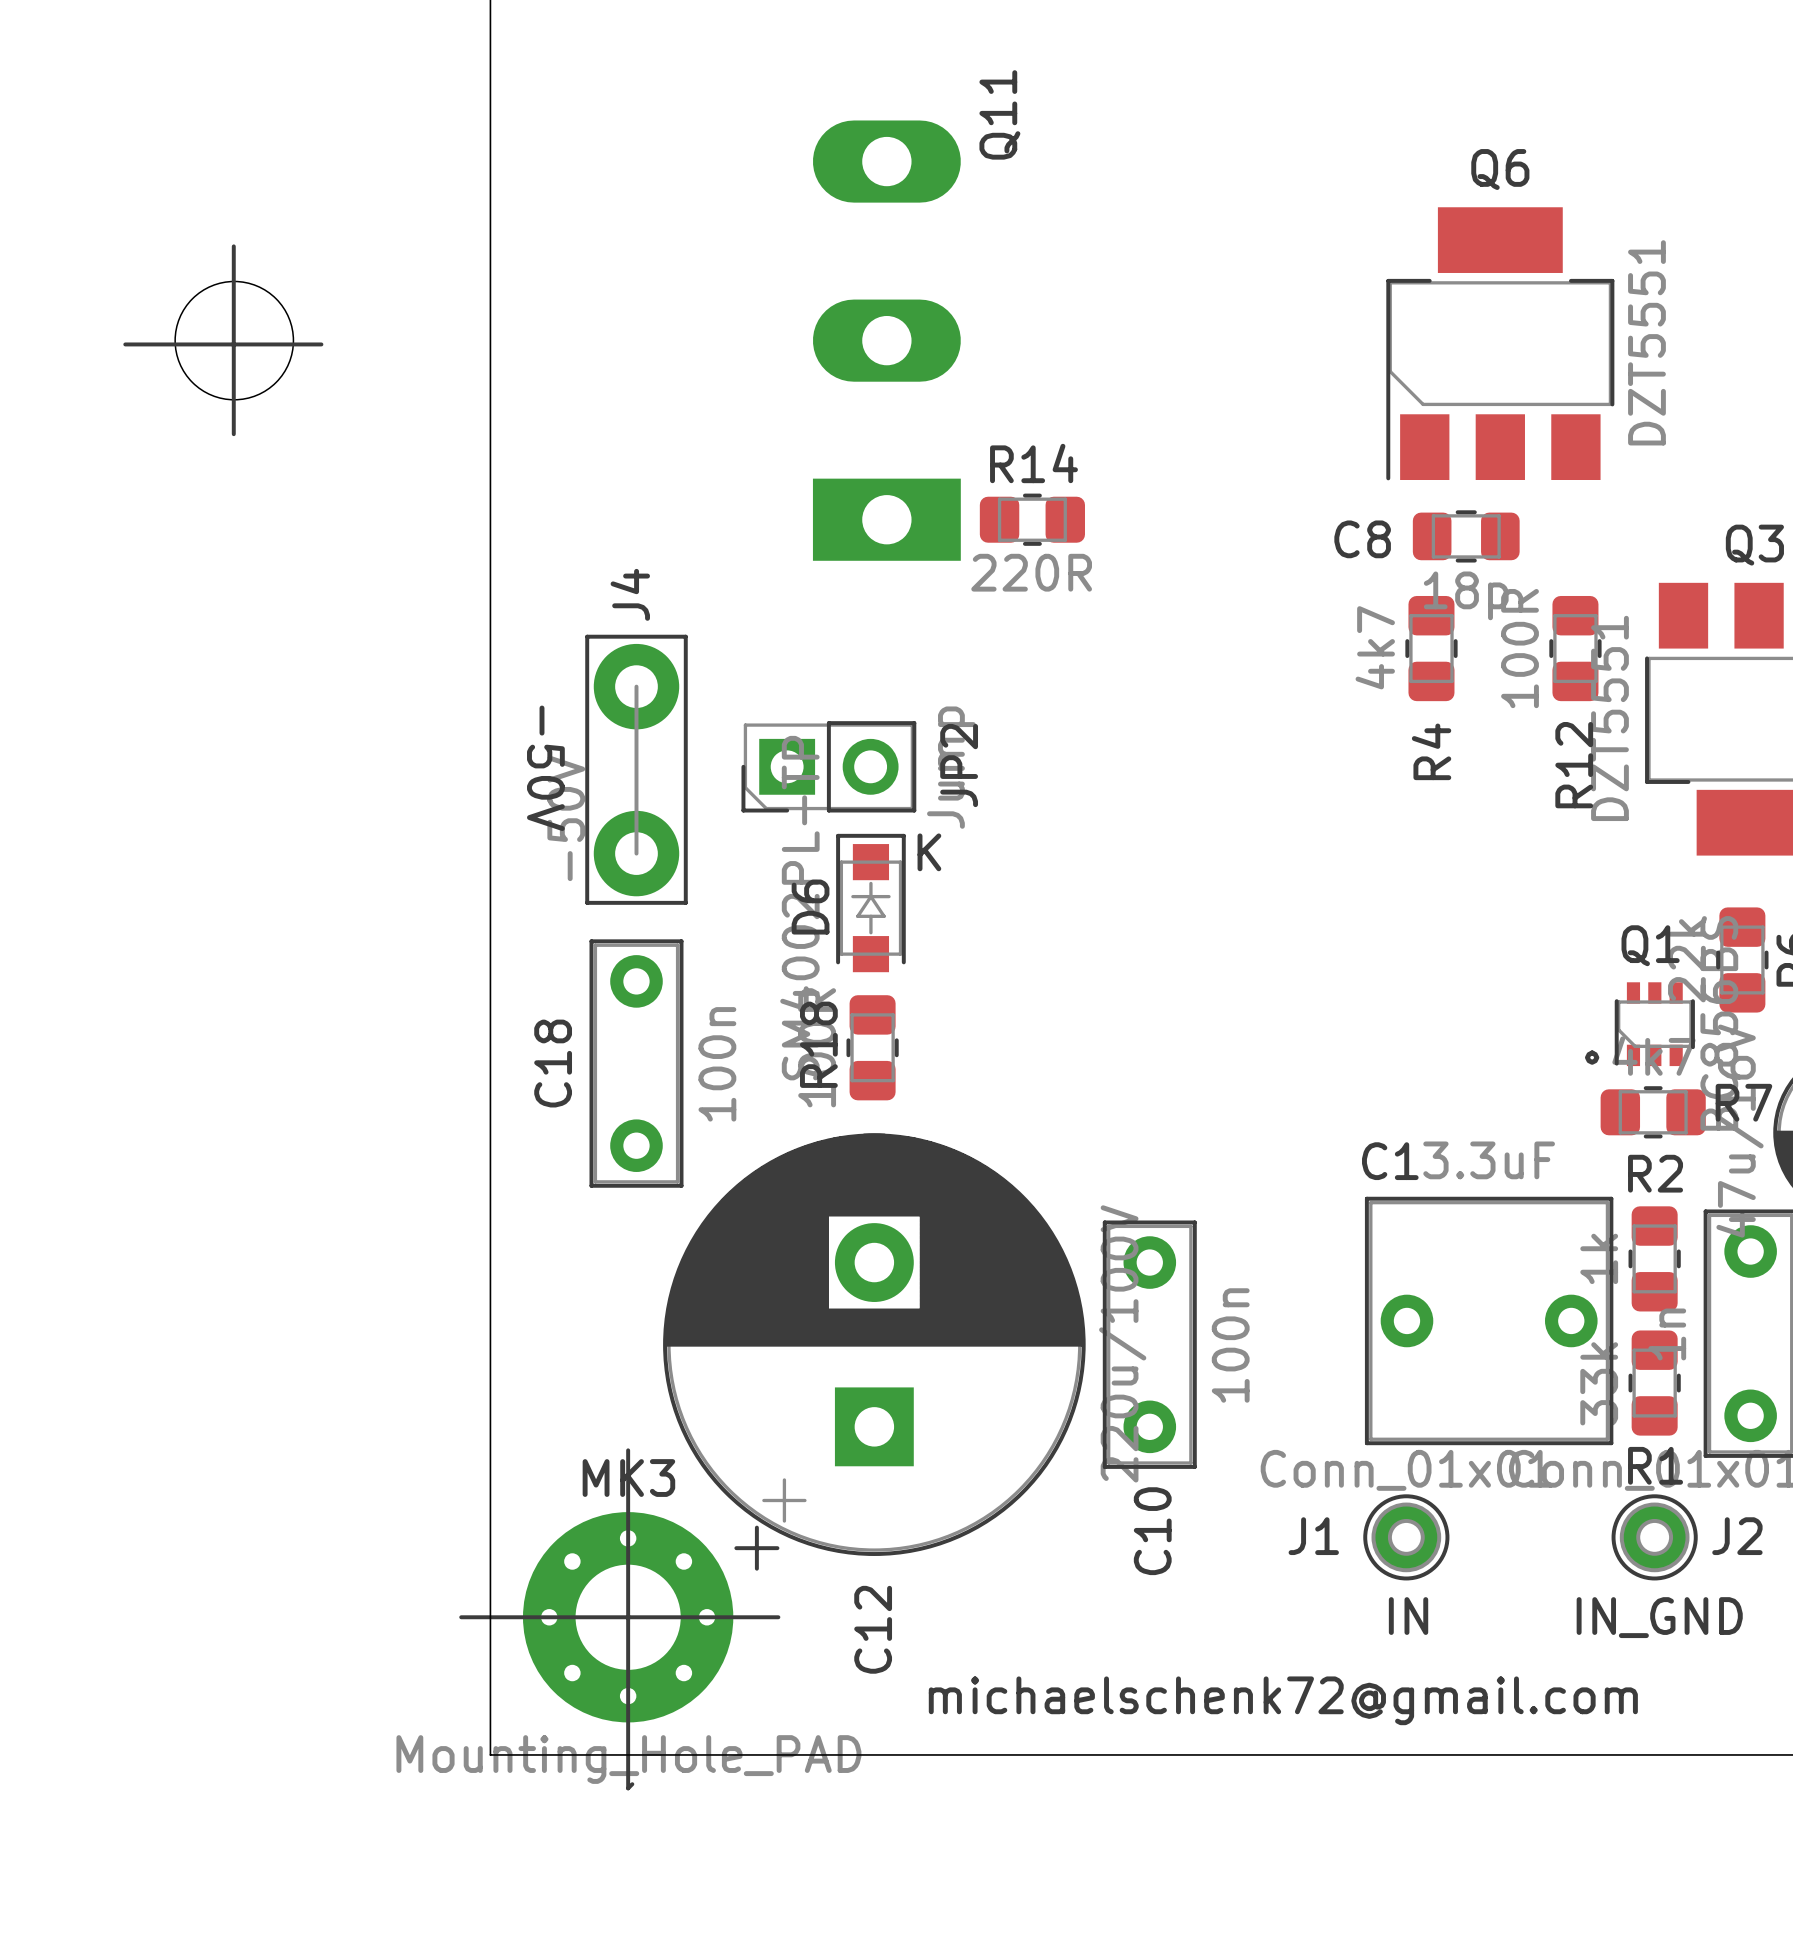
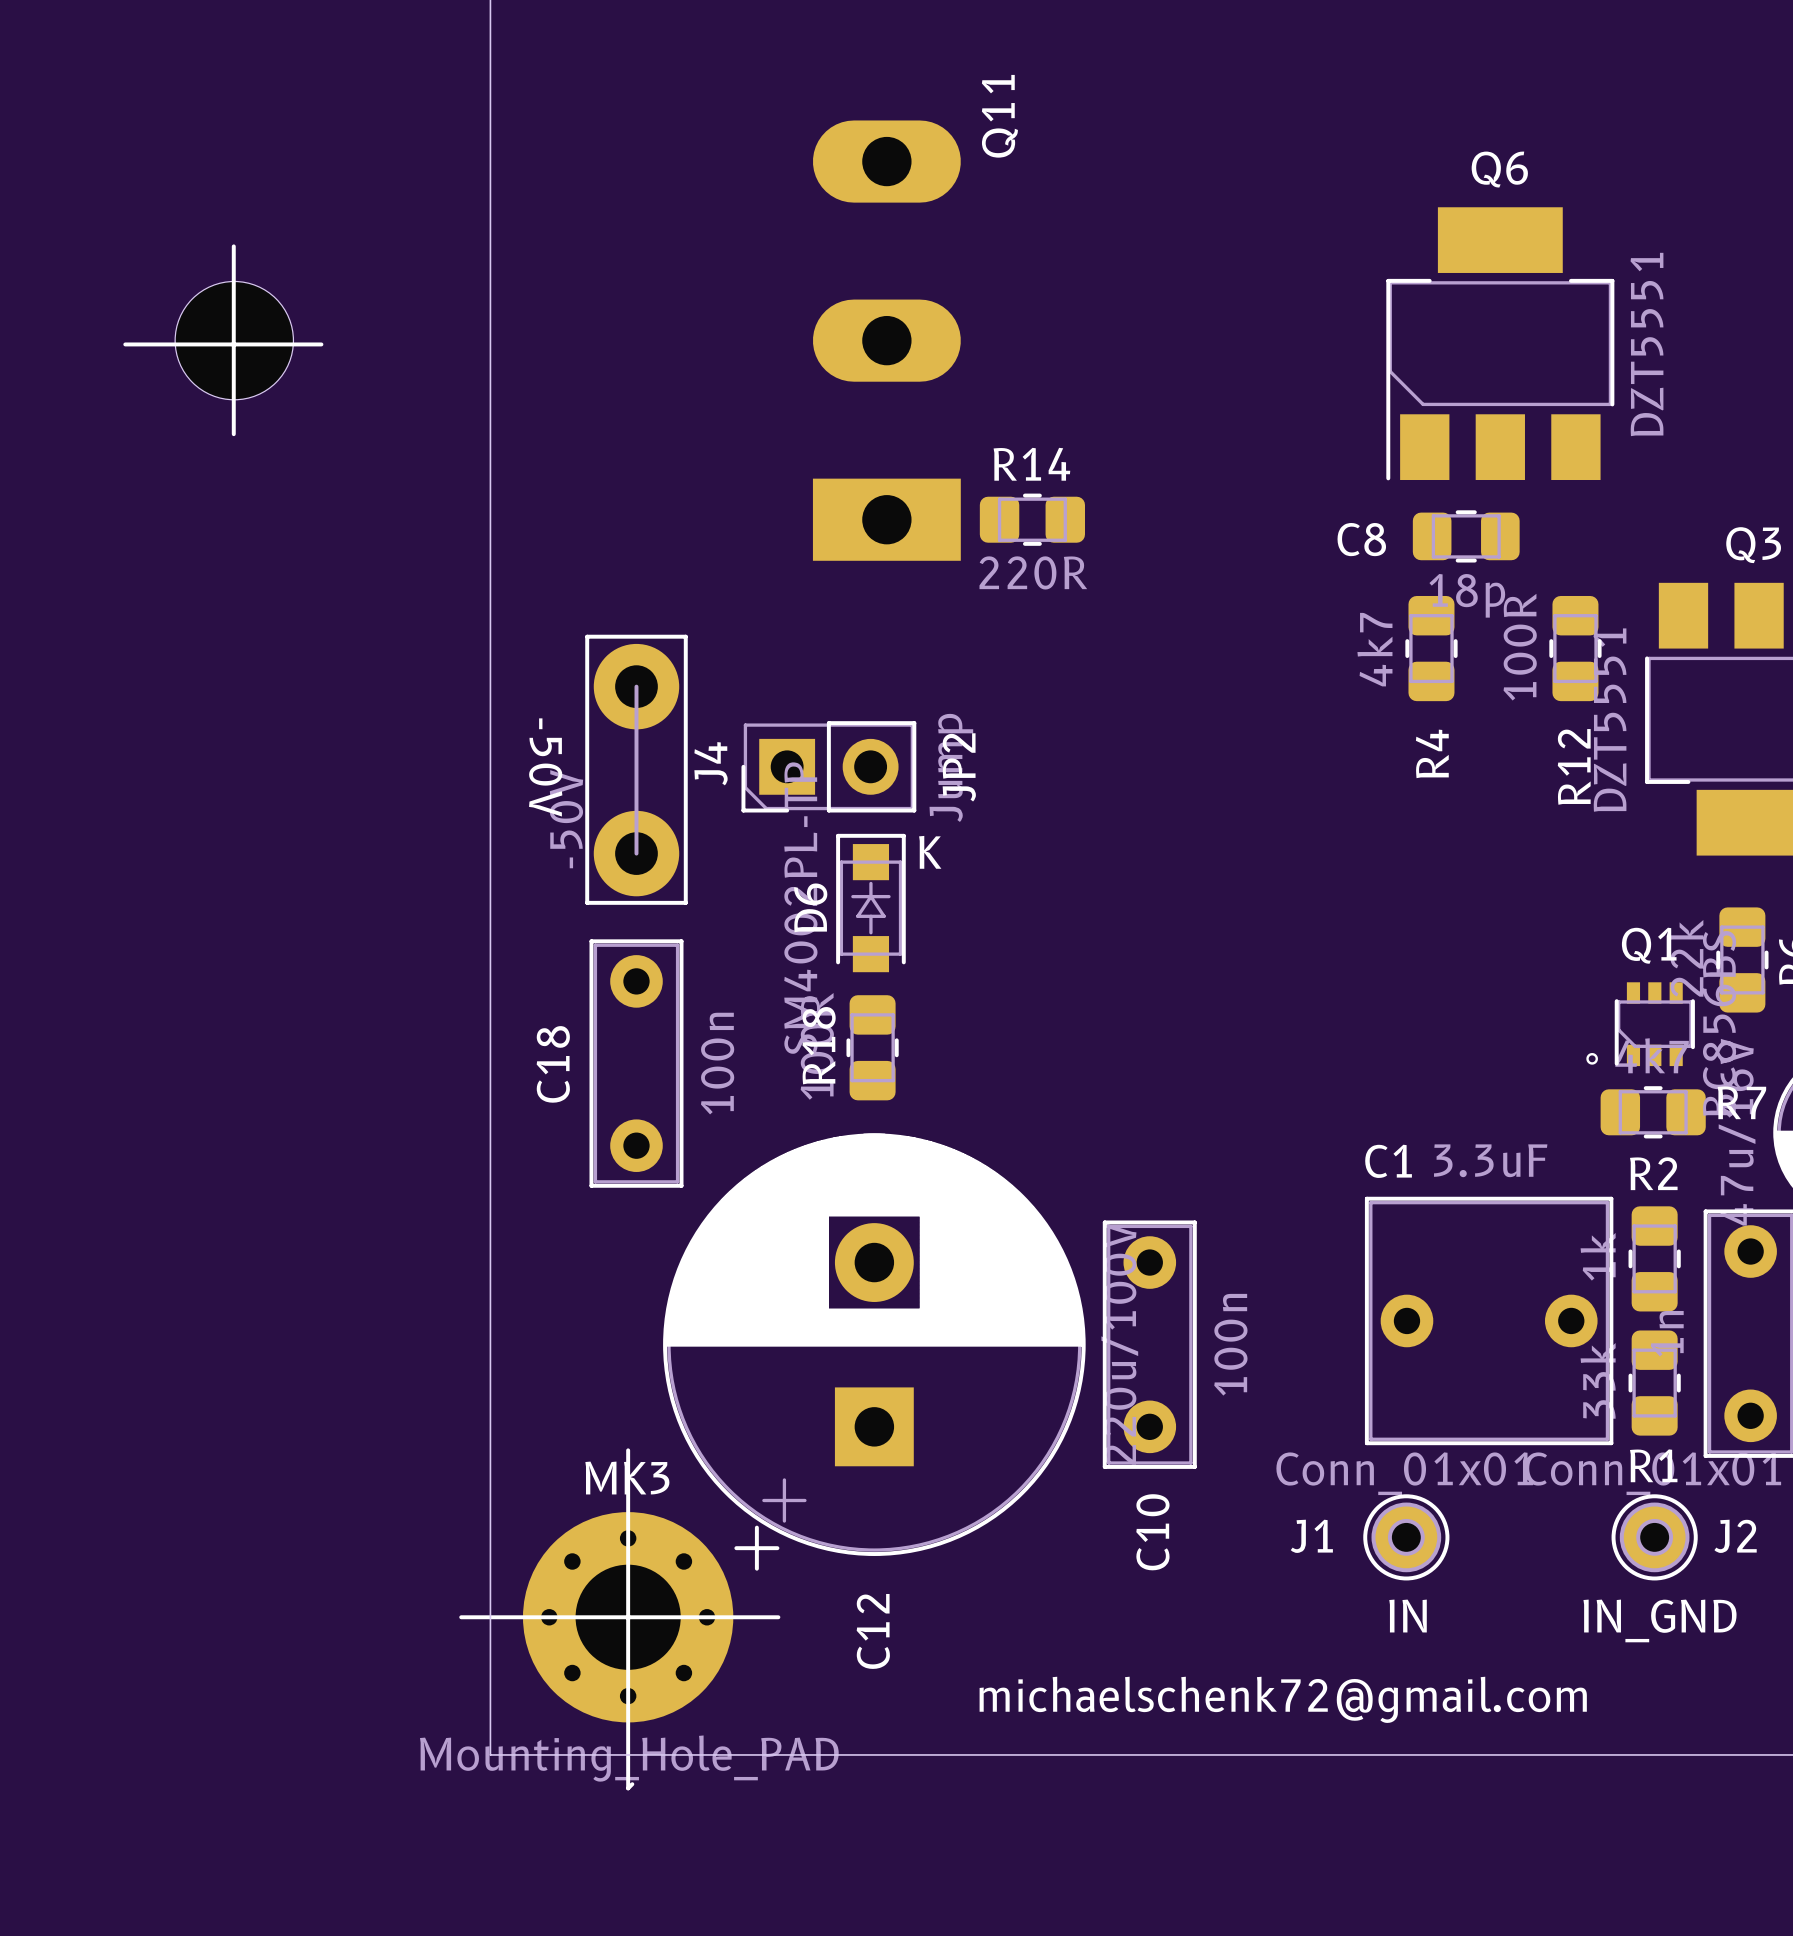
J4 name position: J4 (630, 594) -> J4 (711, 763)

